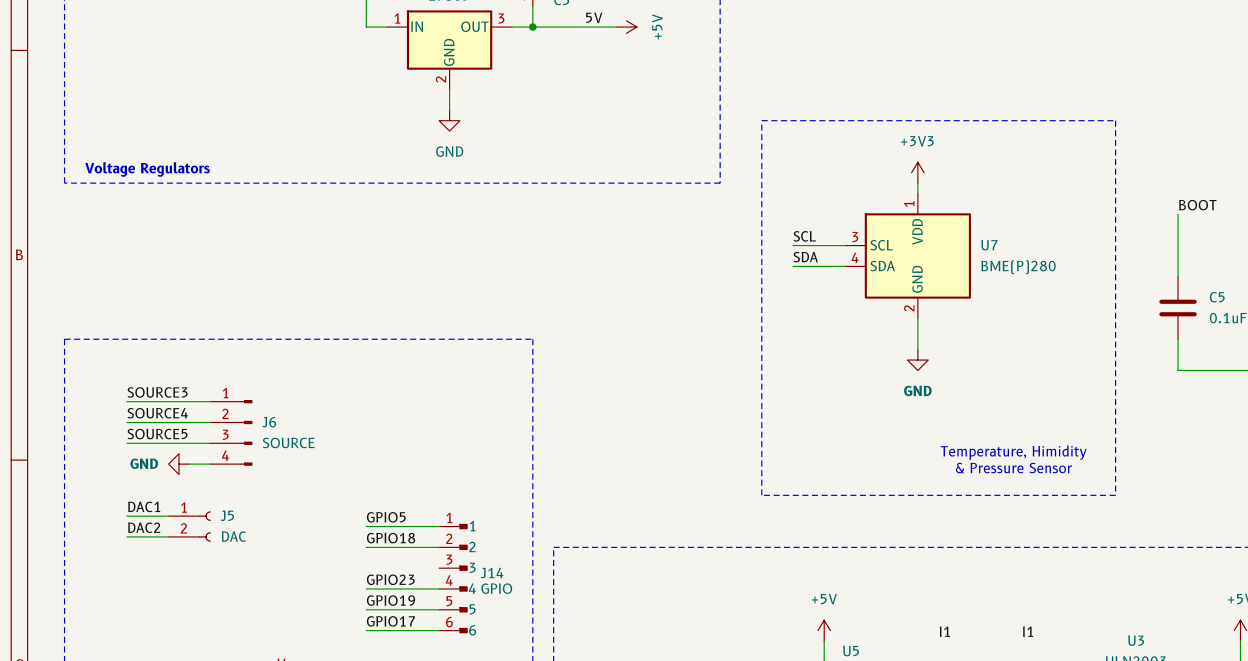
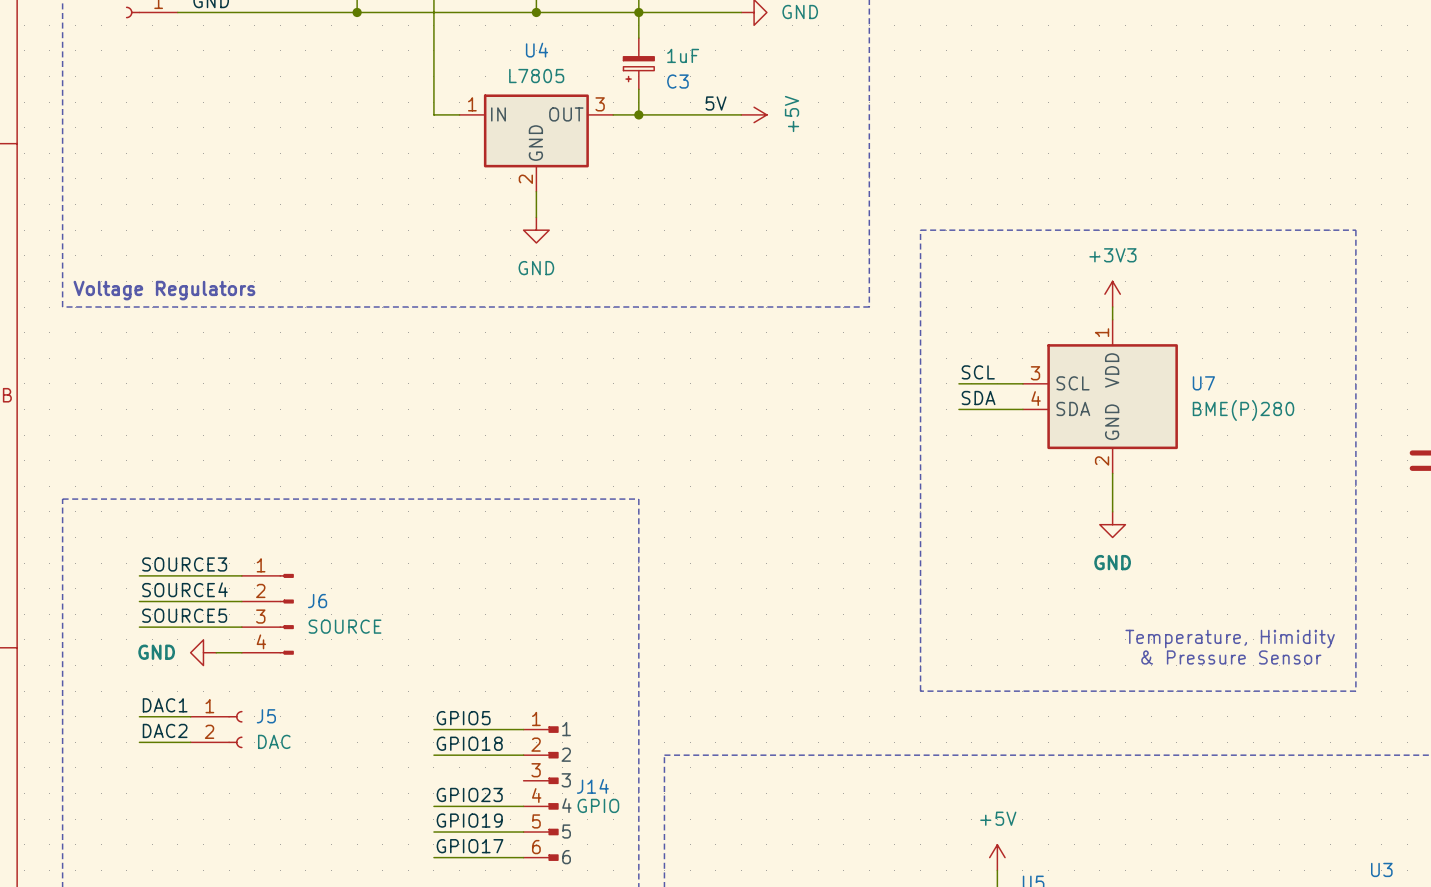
label: I1 (944, 631) -> none
label: I1 (1028, 631) -> none

